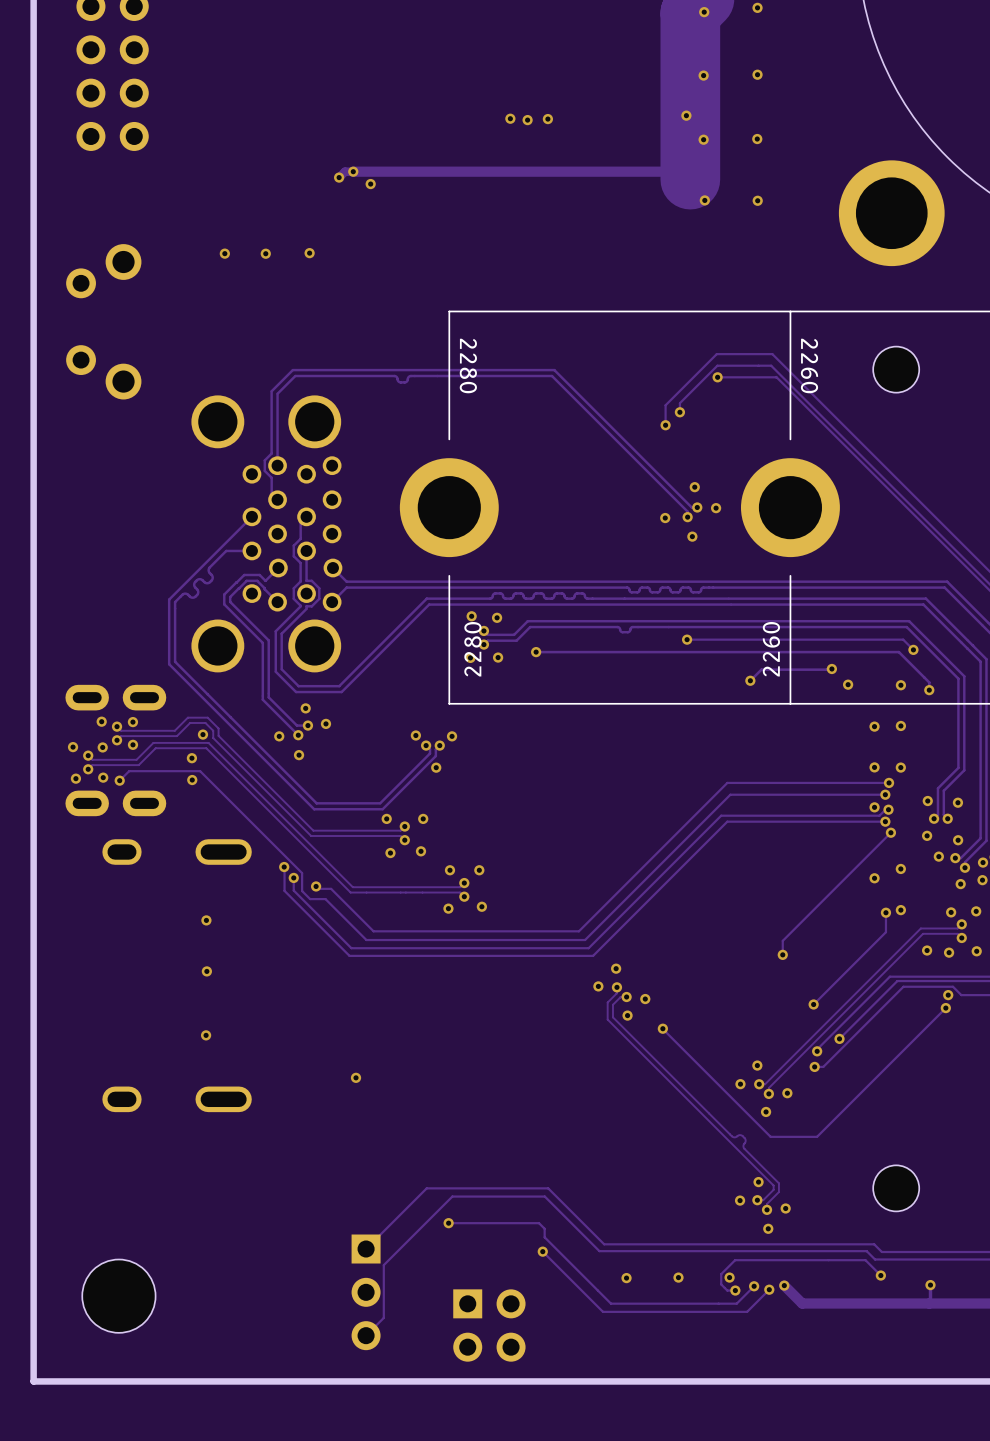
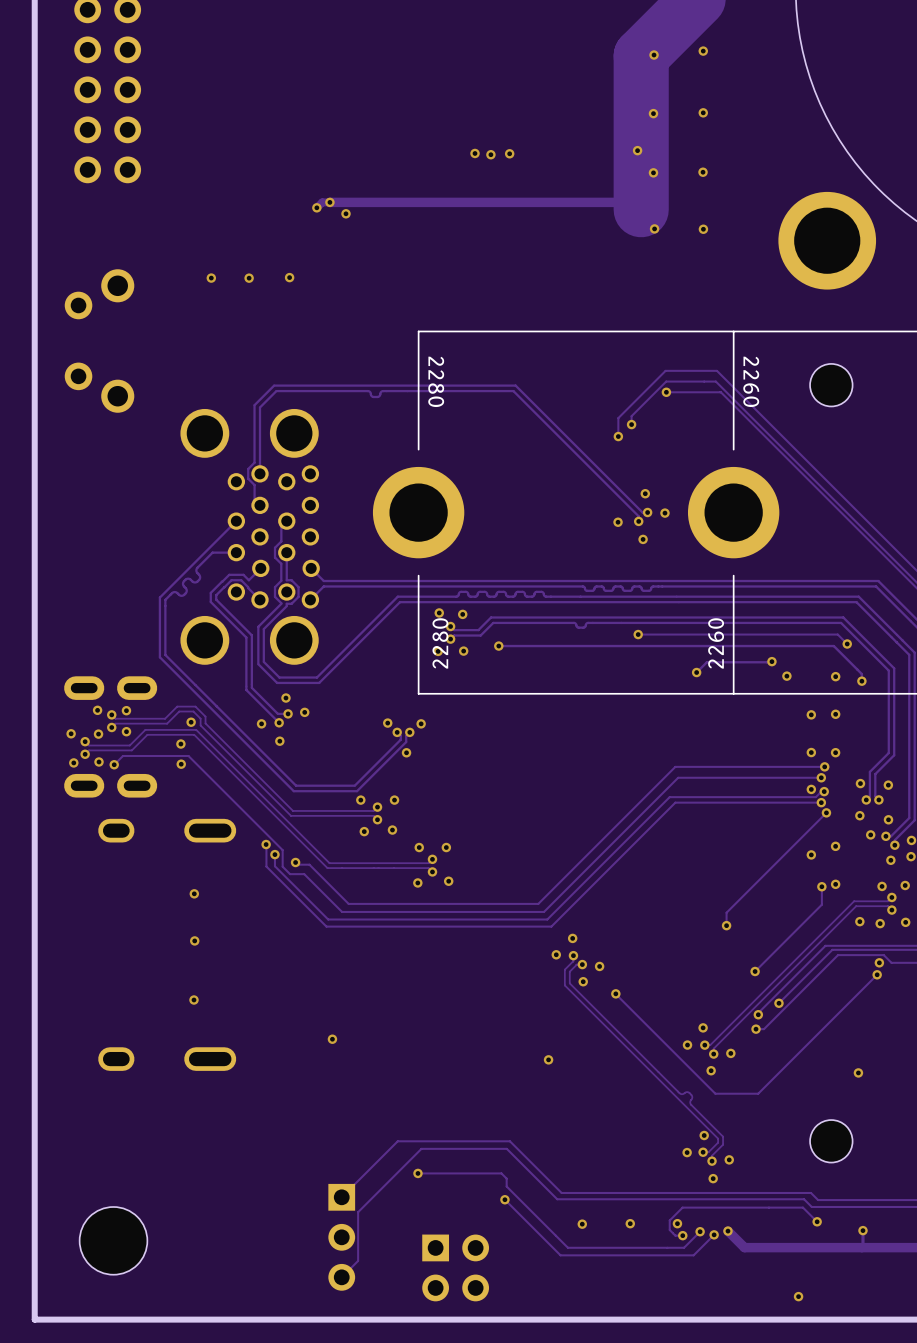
via: none -> (548, 1059)
via: none -> (858, 1072)
via: none -> (798, 1296)

